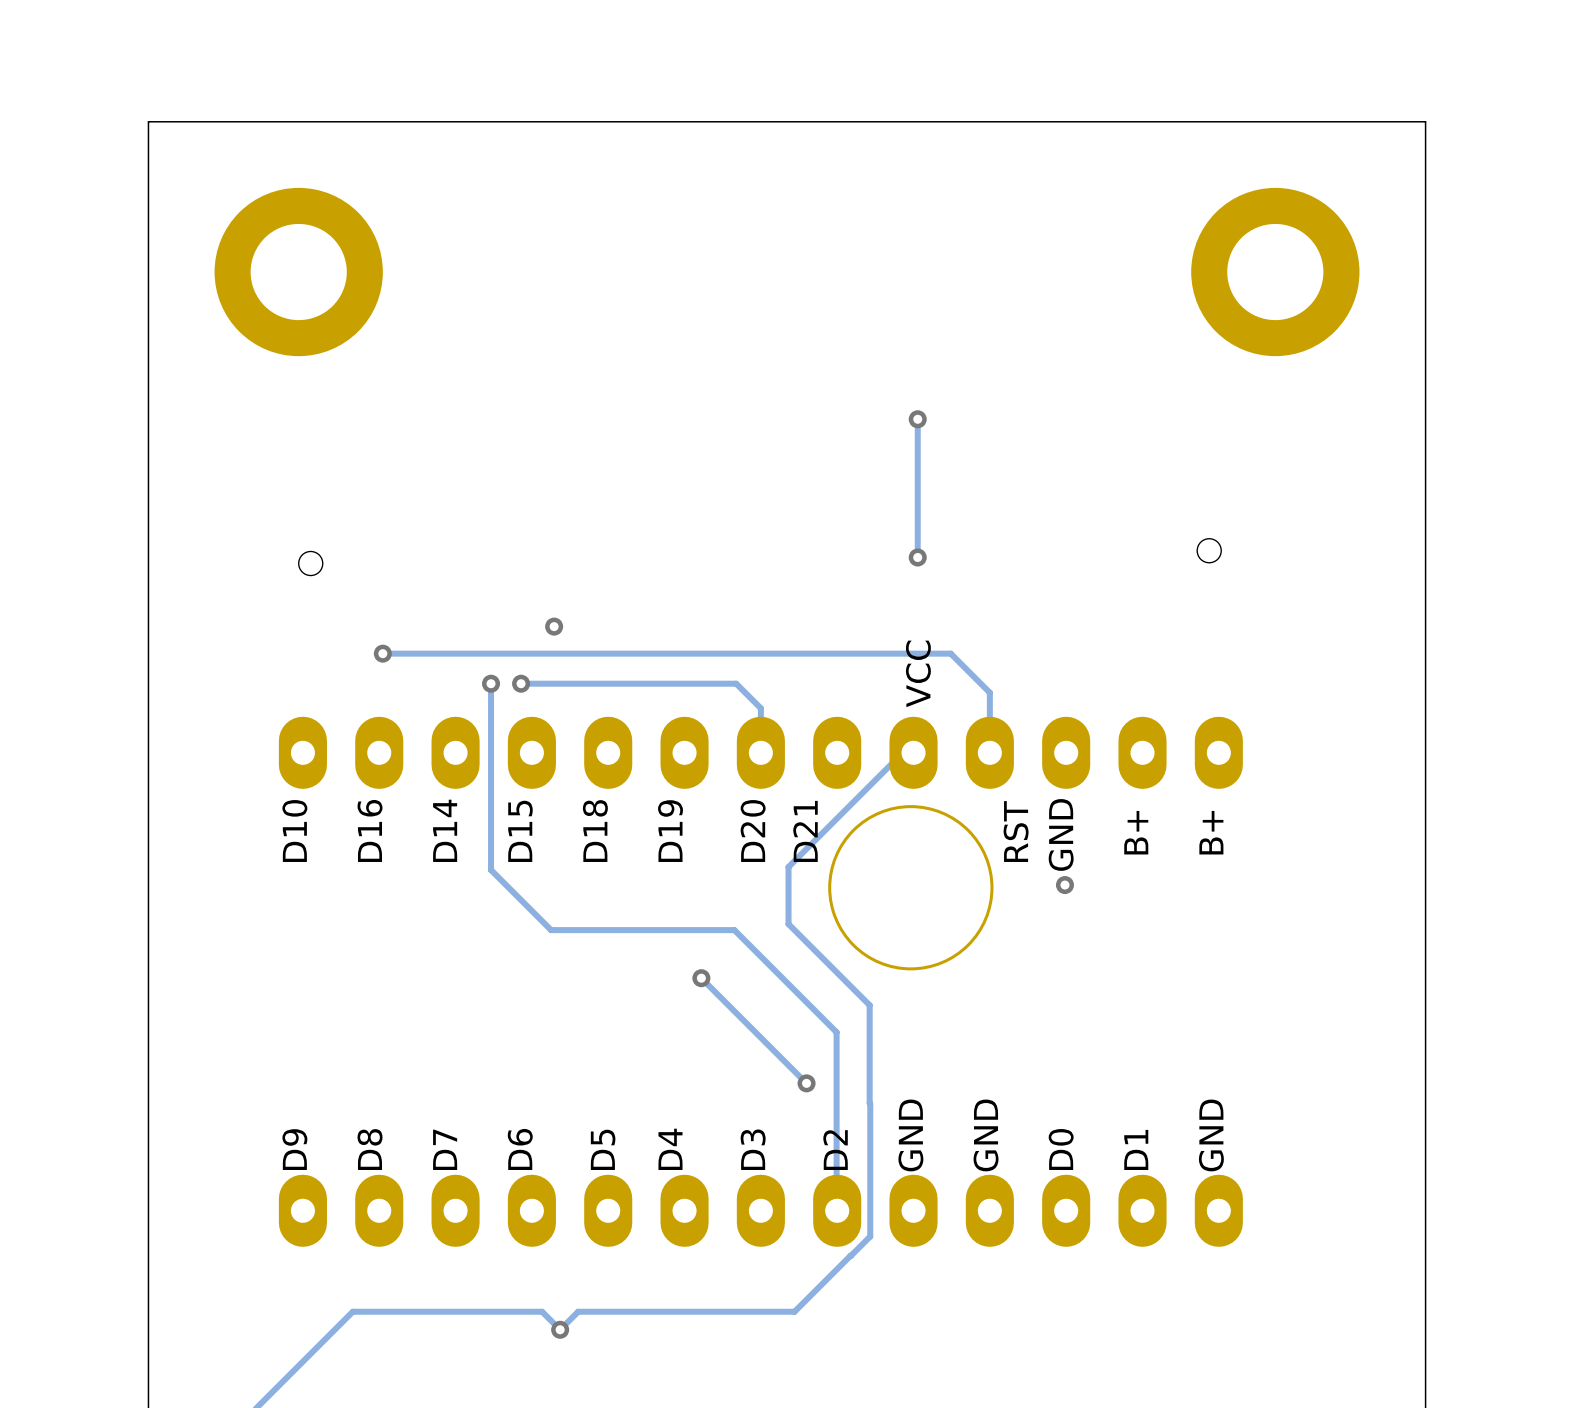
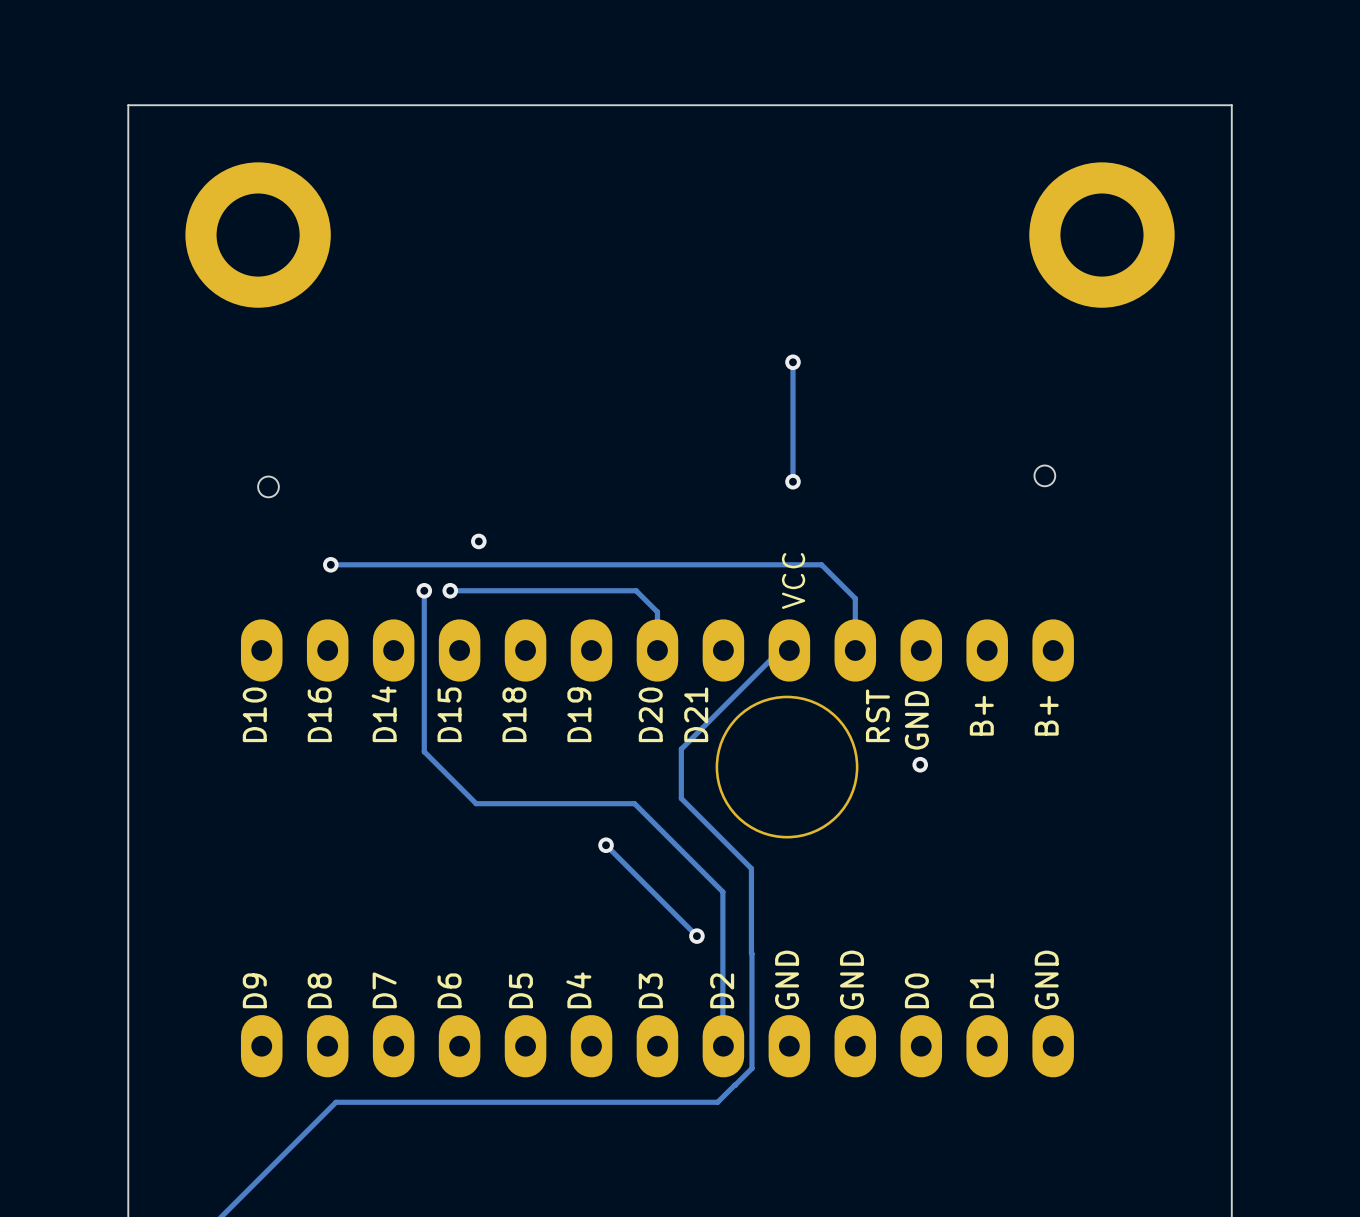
track: (830, 1275) (794, 1311) (578, 1311) (560, 1329) (542, 1311) (352, 1311) -> (717, 1102) (336, 1102) (304, 1133)
via: (560, 1329) -> none

